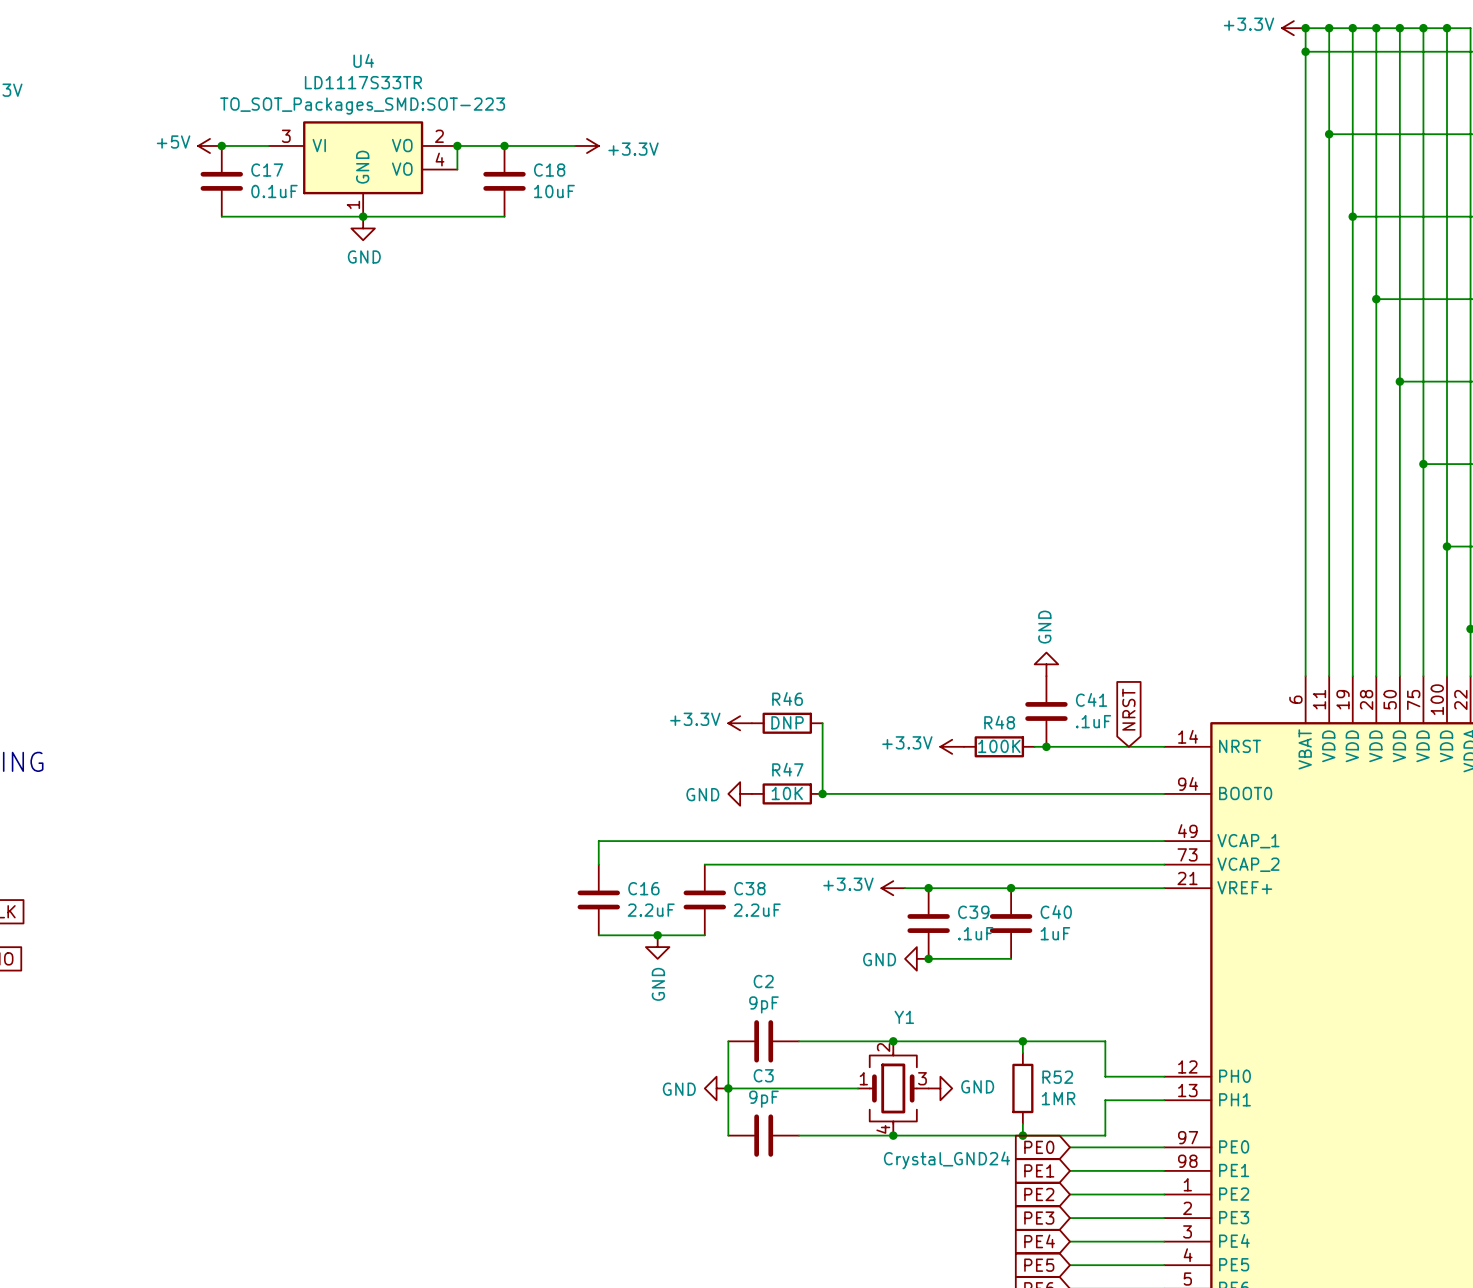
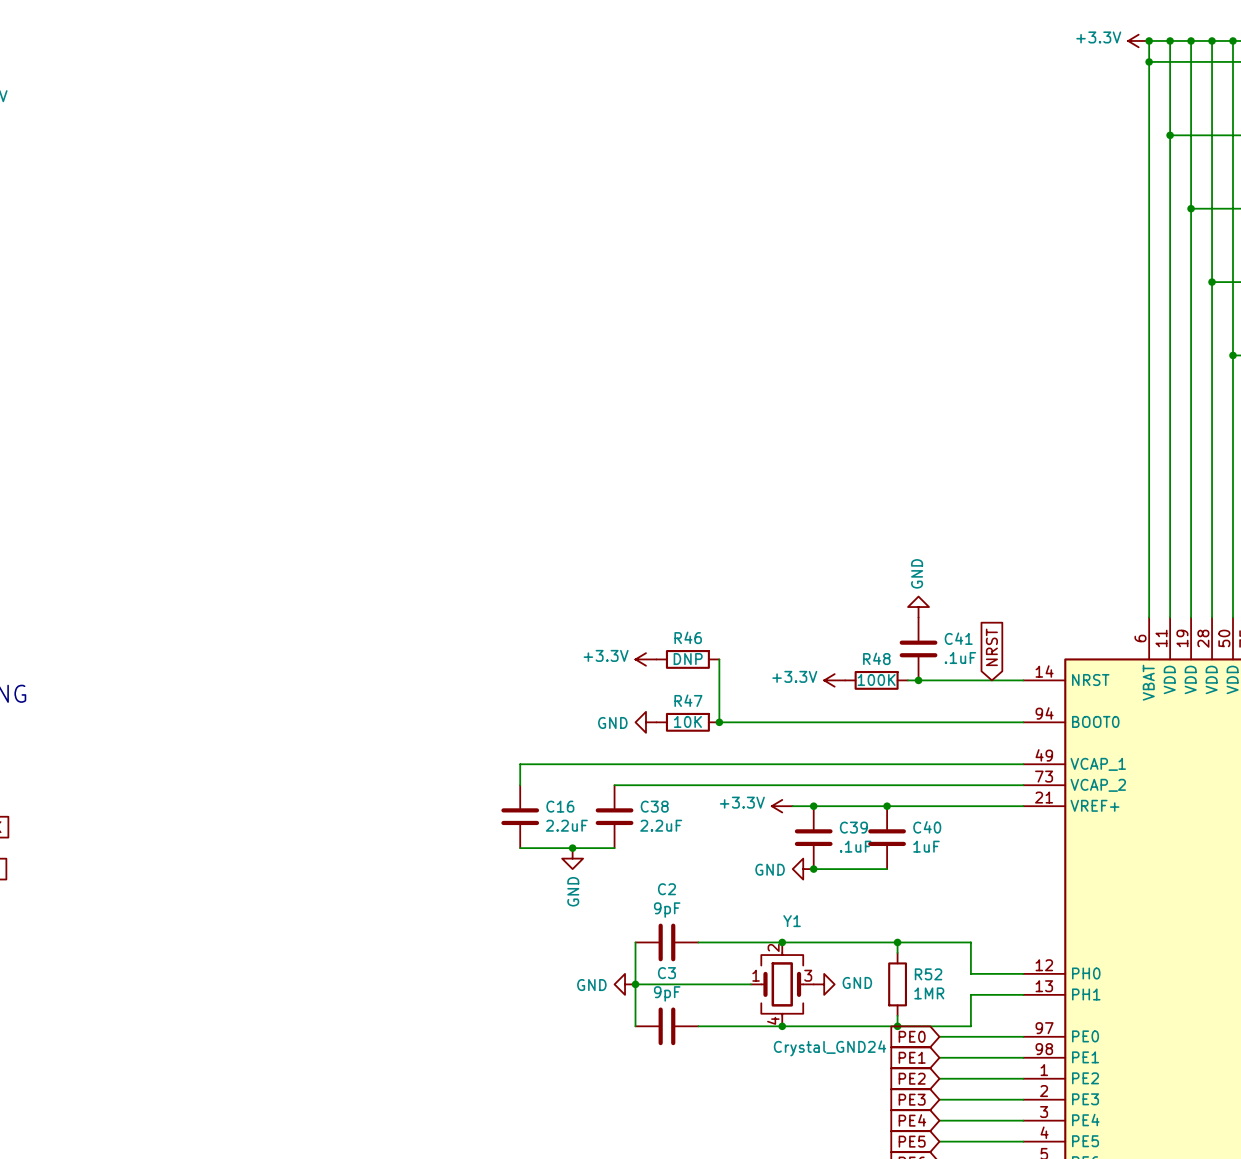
power symbol: +5V (209, 145) -> none
wire: (221, 145) (268, 145) -> none
junction: (221, 145) -> none
junction: (457, 145) -> none
junction: (504, 145) -> none
wire: (575, 145) (457, 145) (457, 169) -> none
power symbol: +3.3V (586, 145) -> none
U4: LD1117S33TR (363, 168) -> none
C17: 0.1uF (221, 181) -> none
C18: 10uF (504, 181) -> none
wire: (221, 216) (504, 216) -> none
junction: (363, 216) -> none
power symbol: GND (363, 228) -> none

